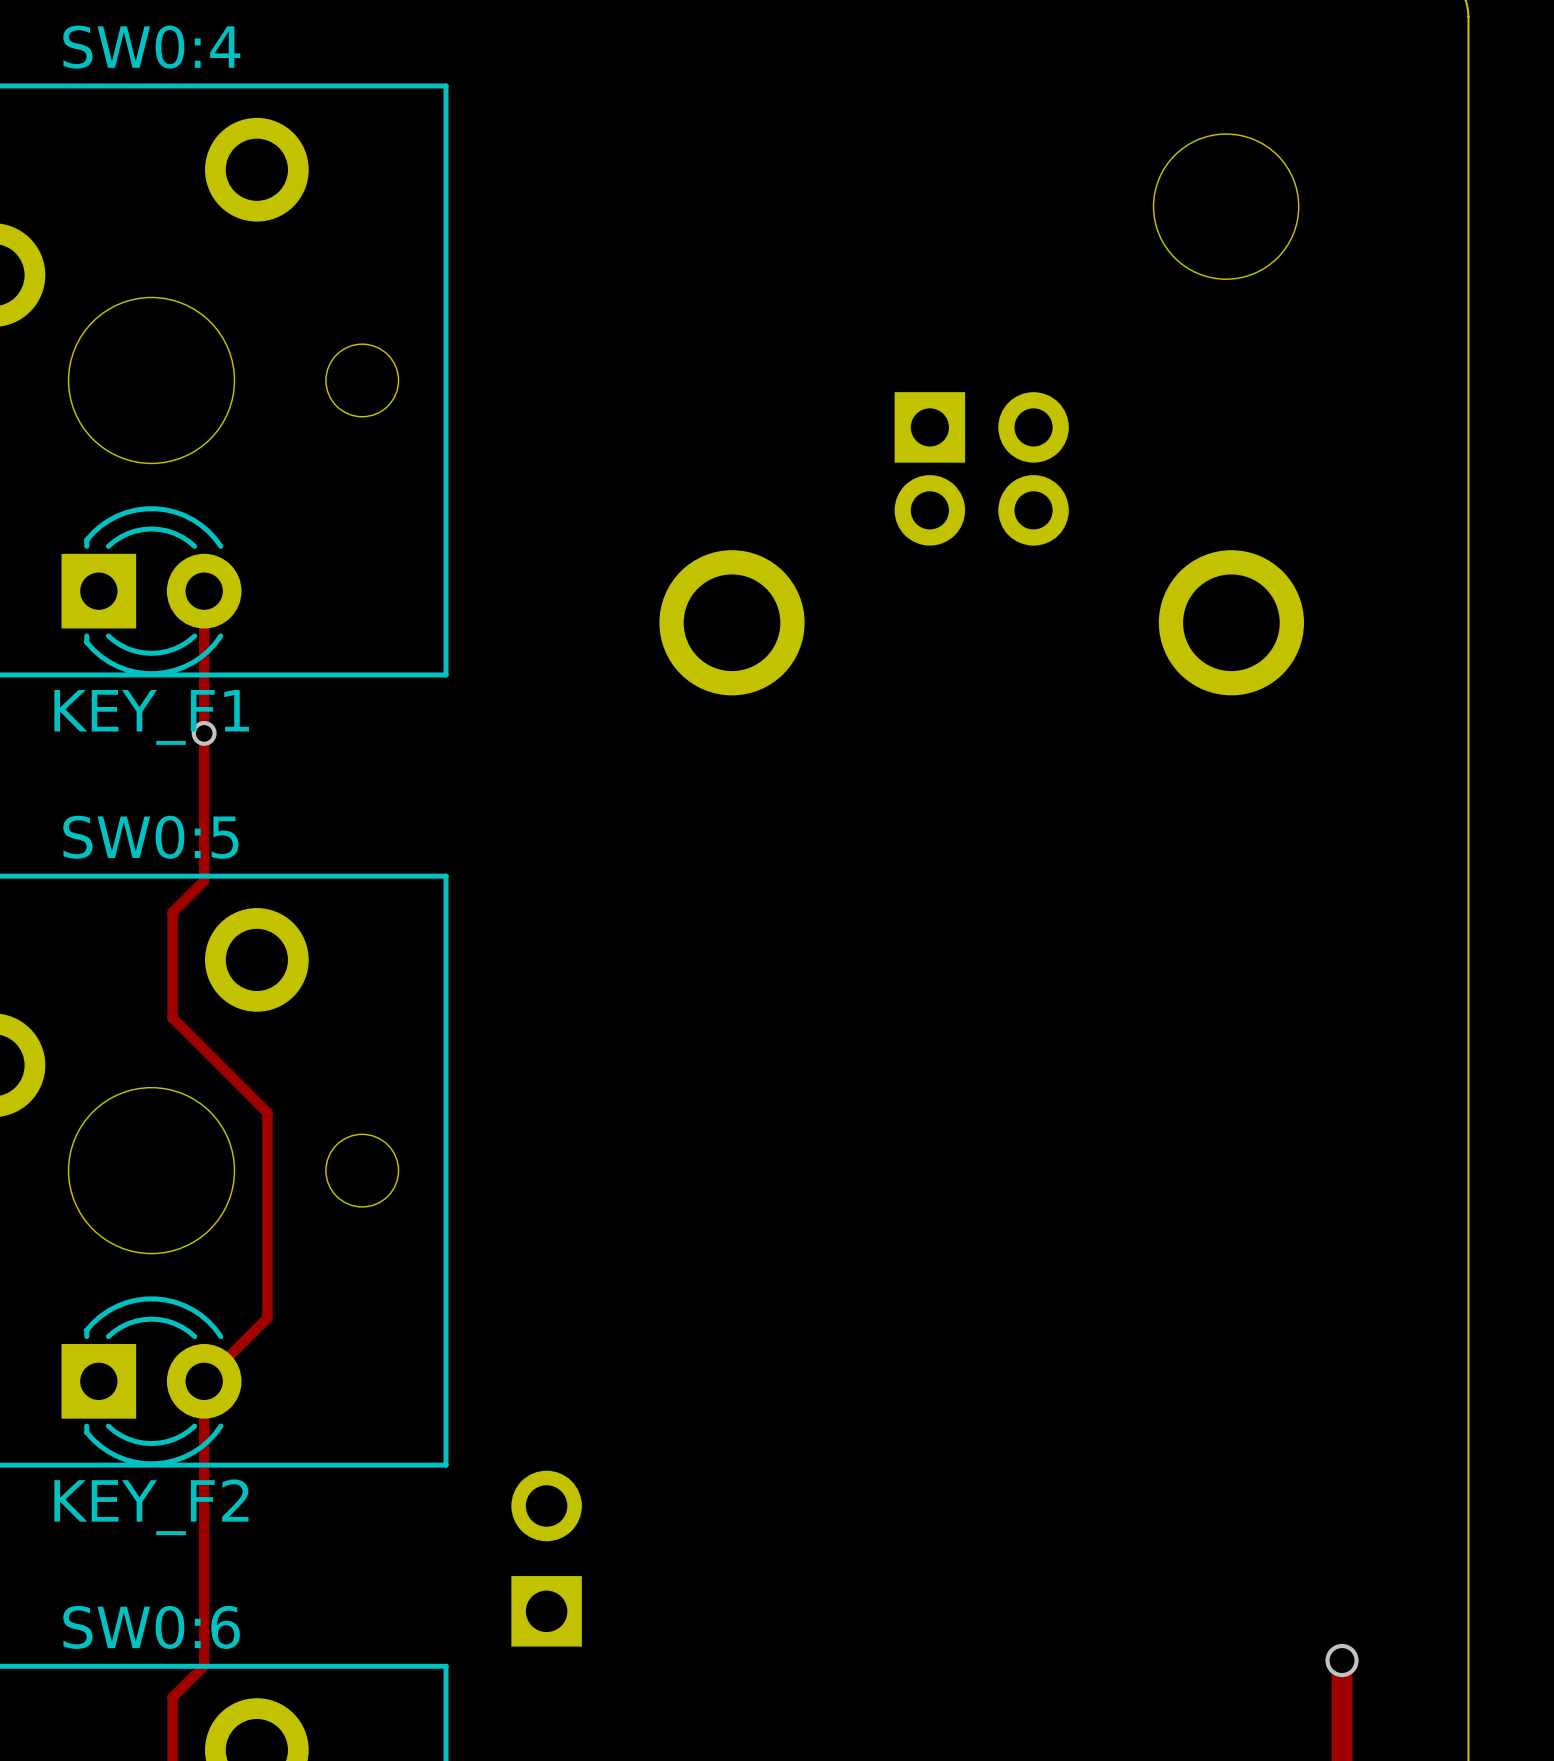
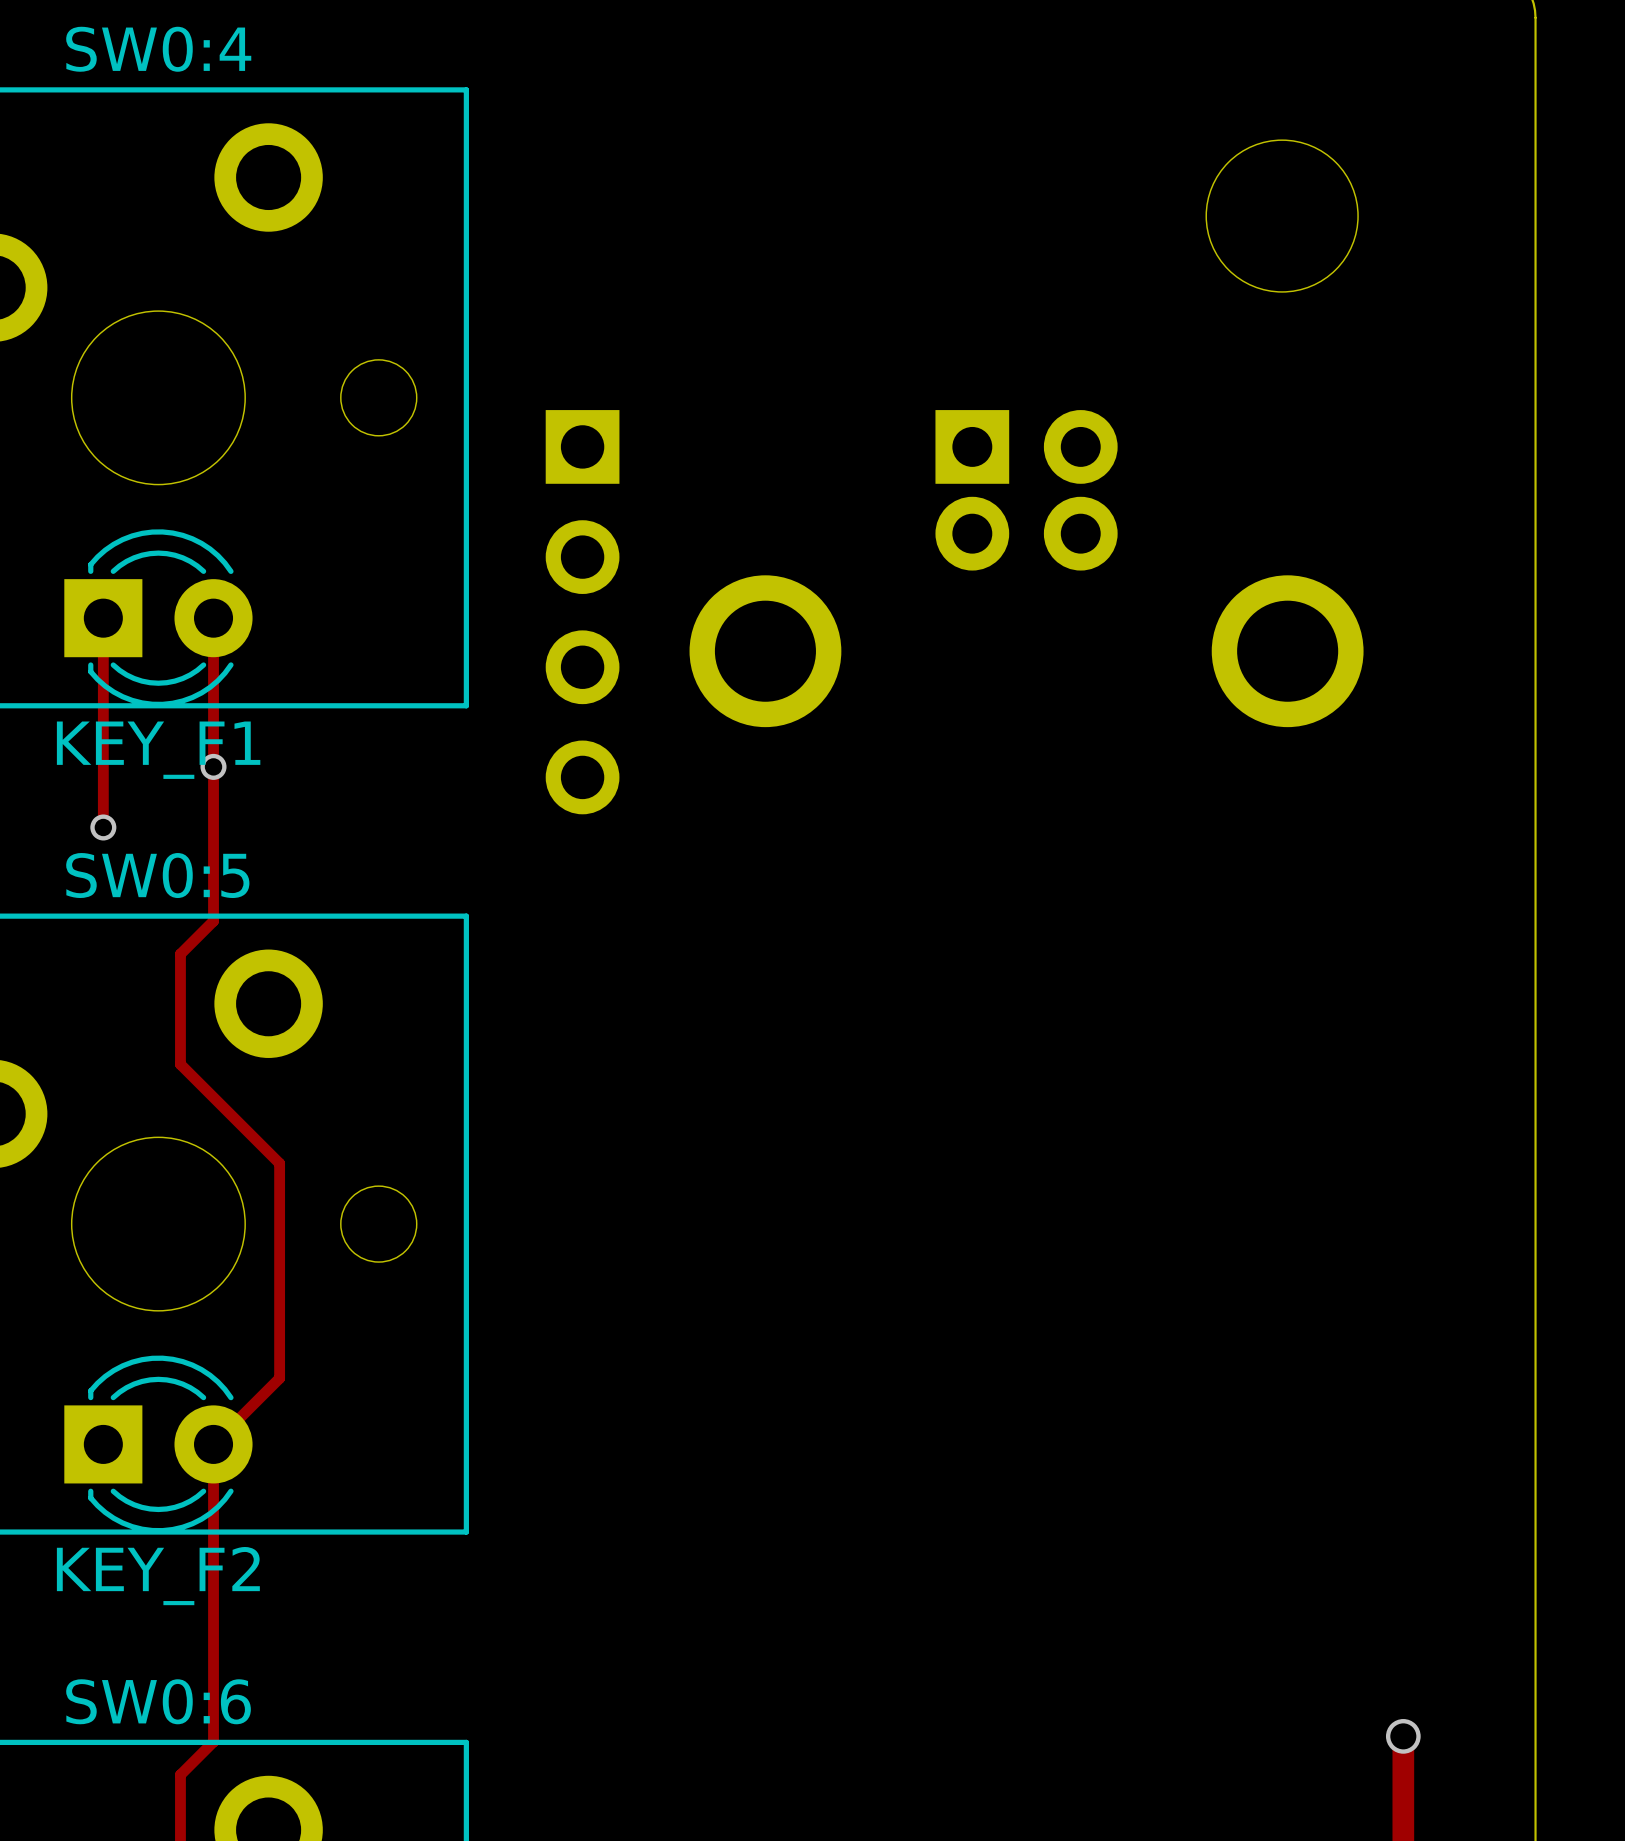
part: none -> (582, 612)
track: none -> (103, 618) (103, 827)
via: none -> (103, 827)
part: (546, 1558) -> none

